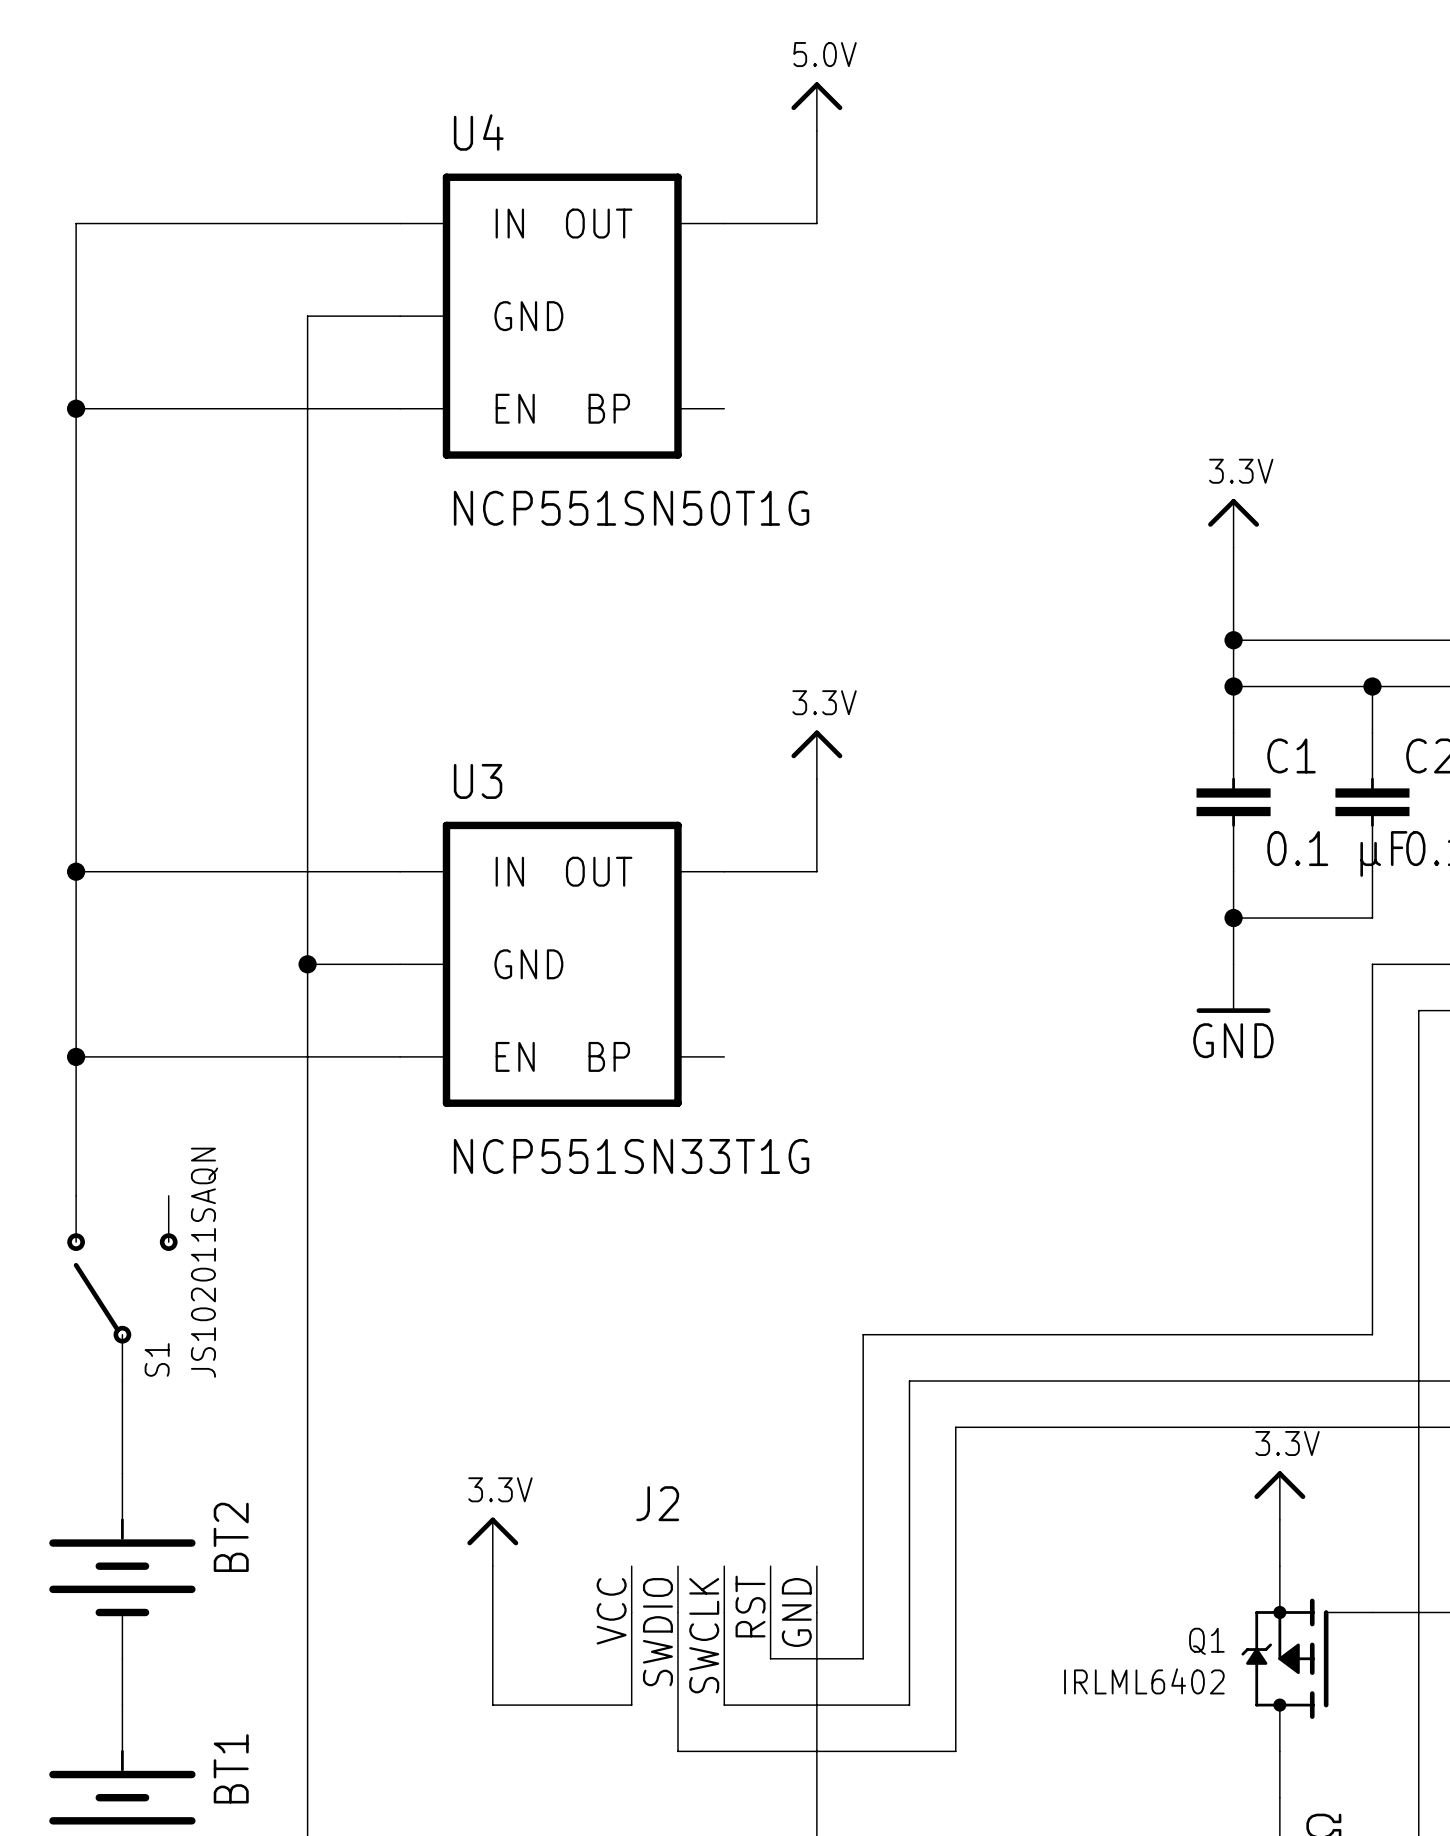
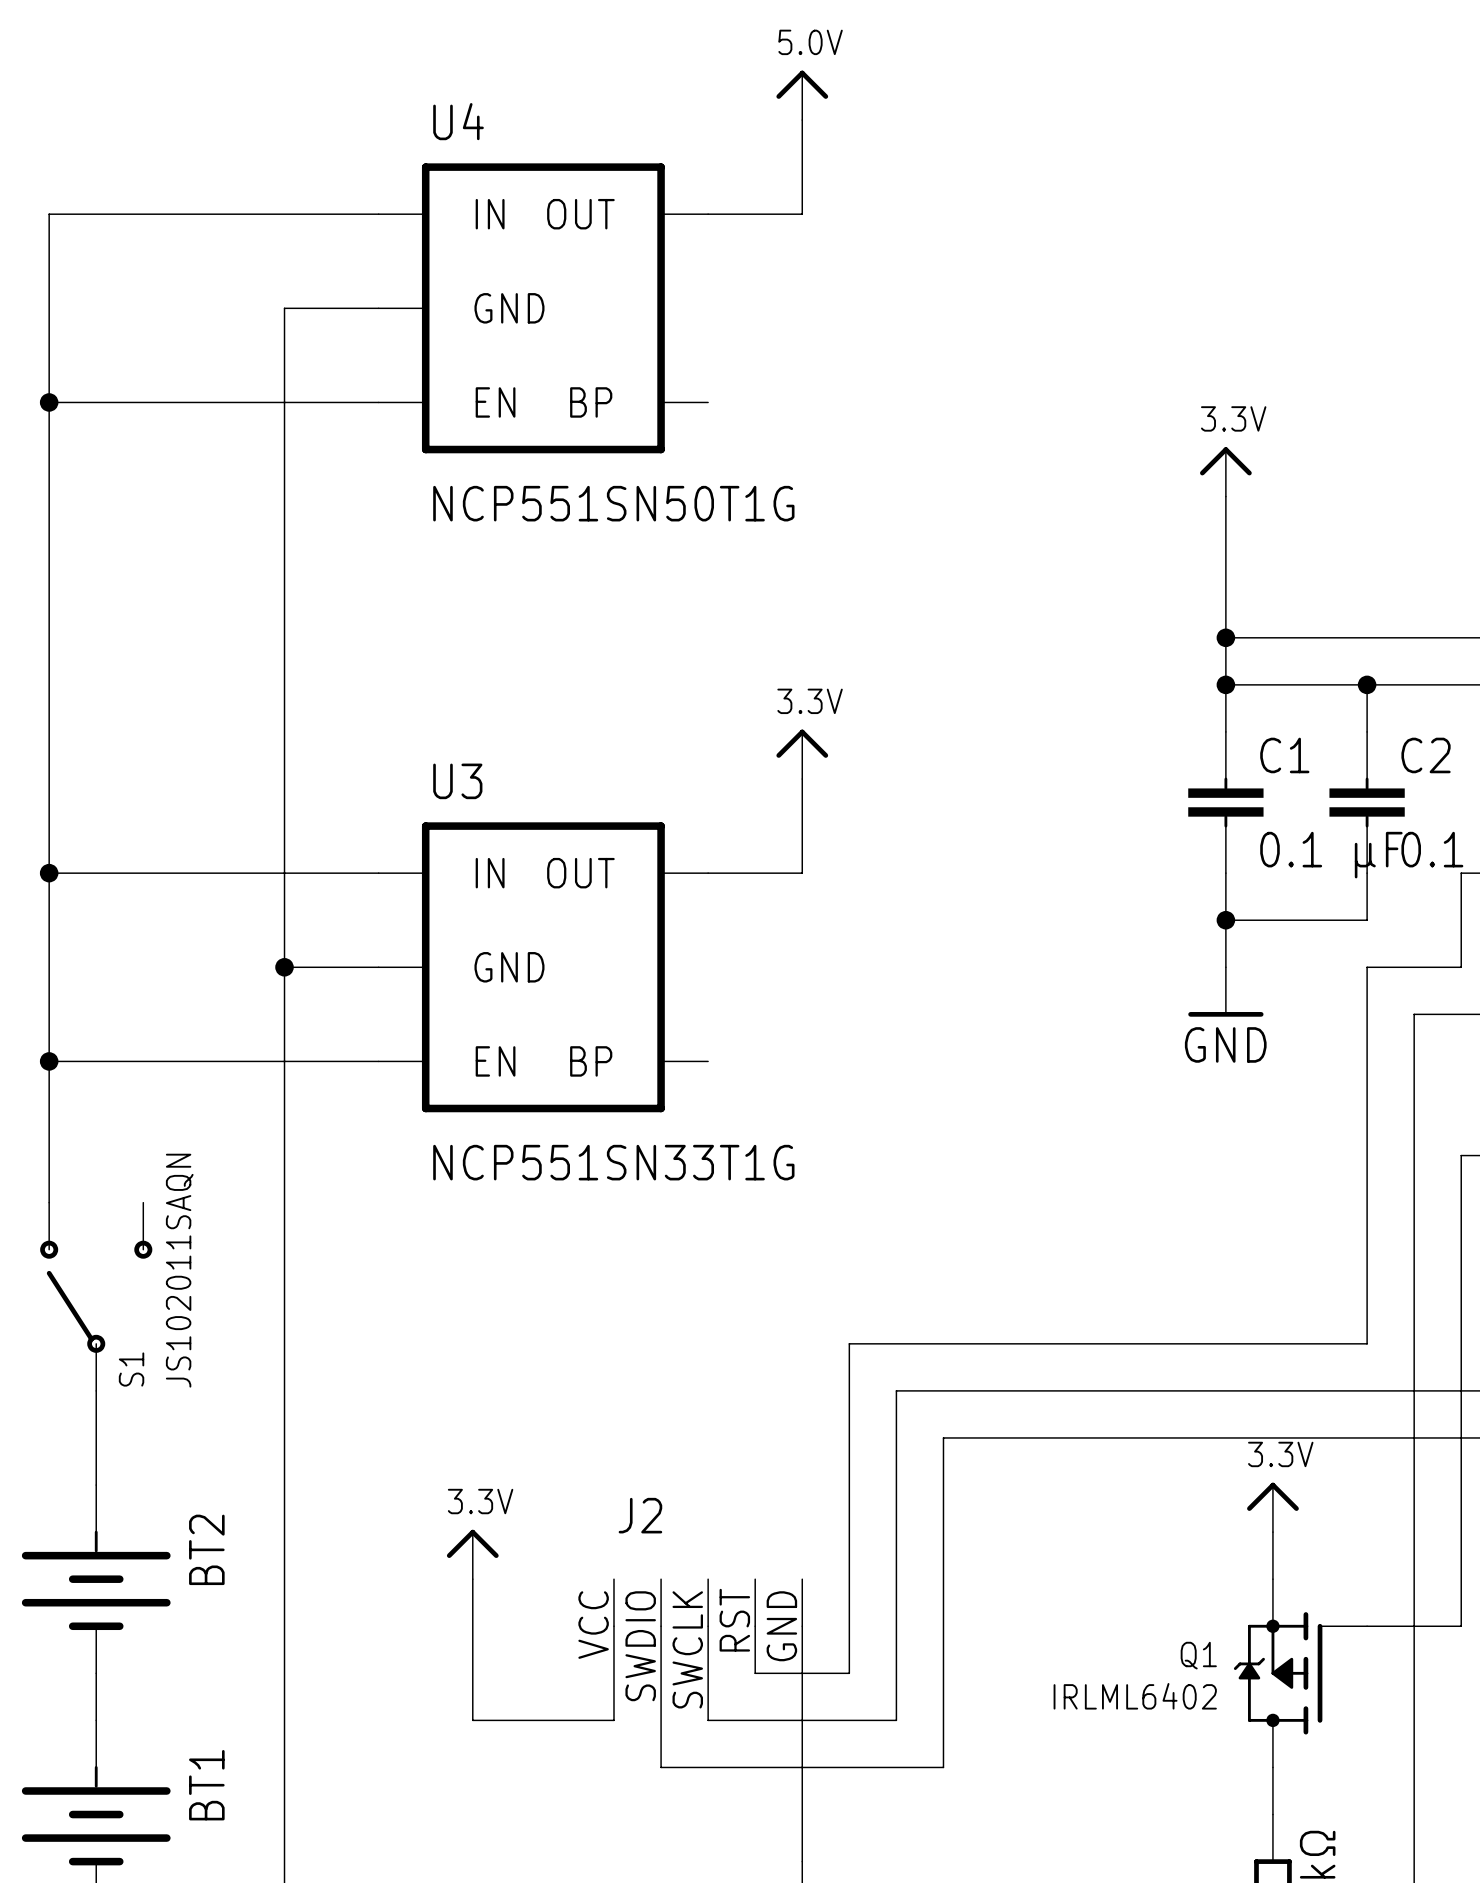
power symbol position: 3.3V (1233, 523) -> 3.3V (1225, 471)

